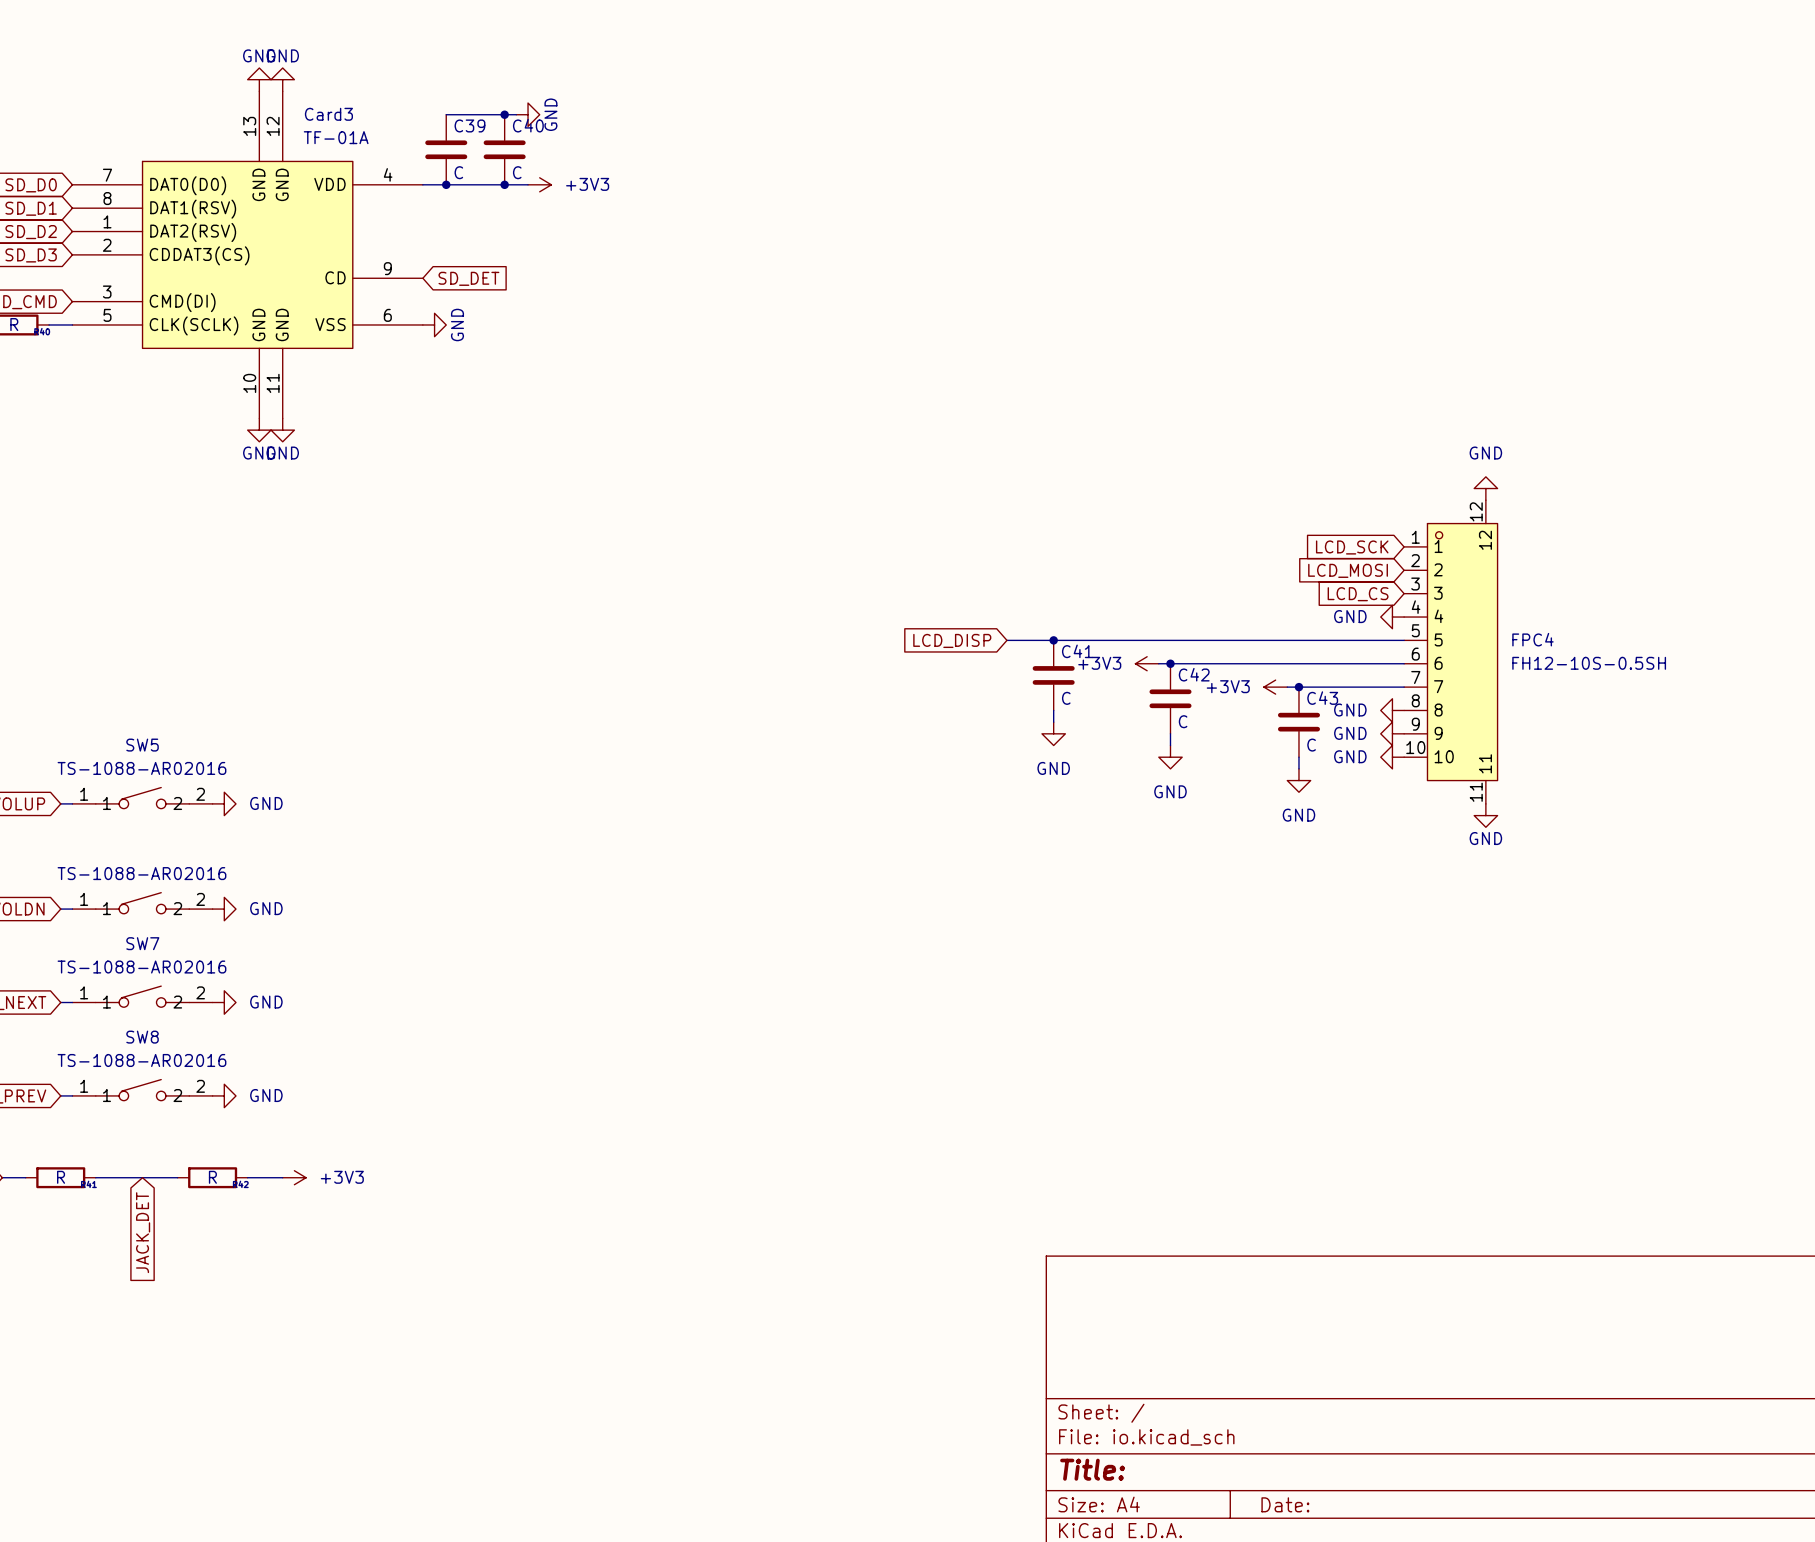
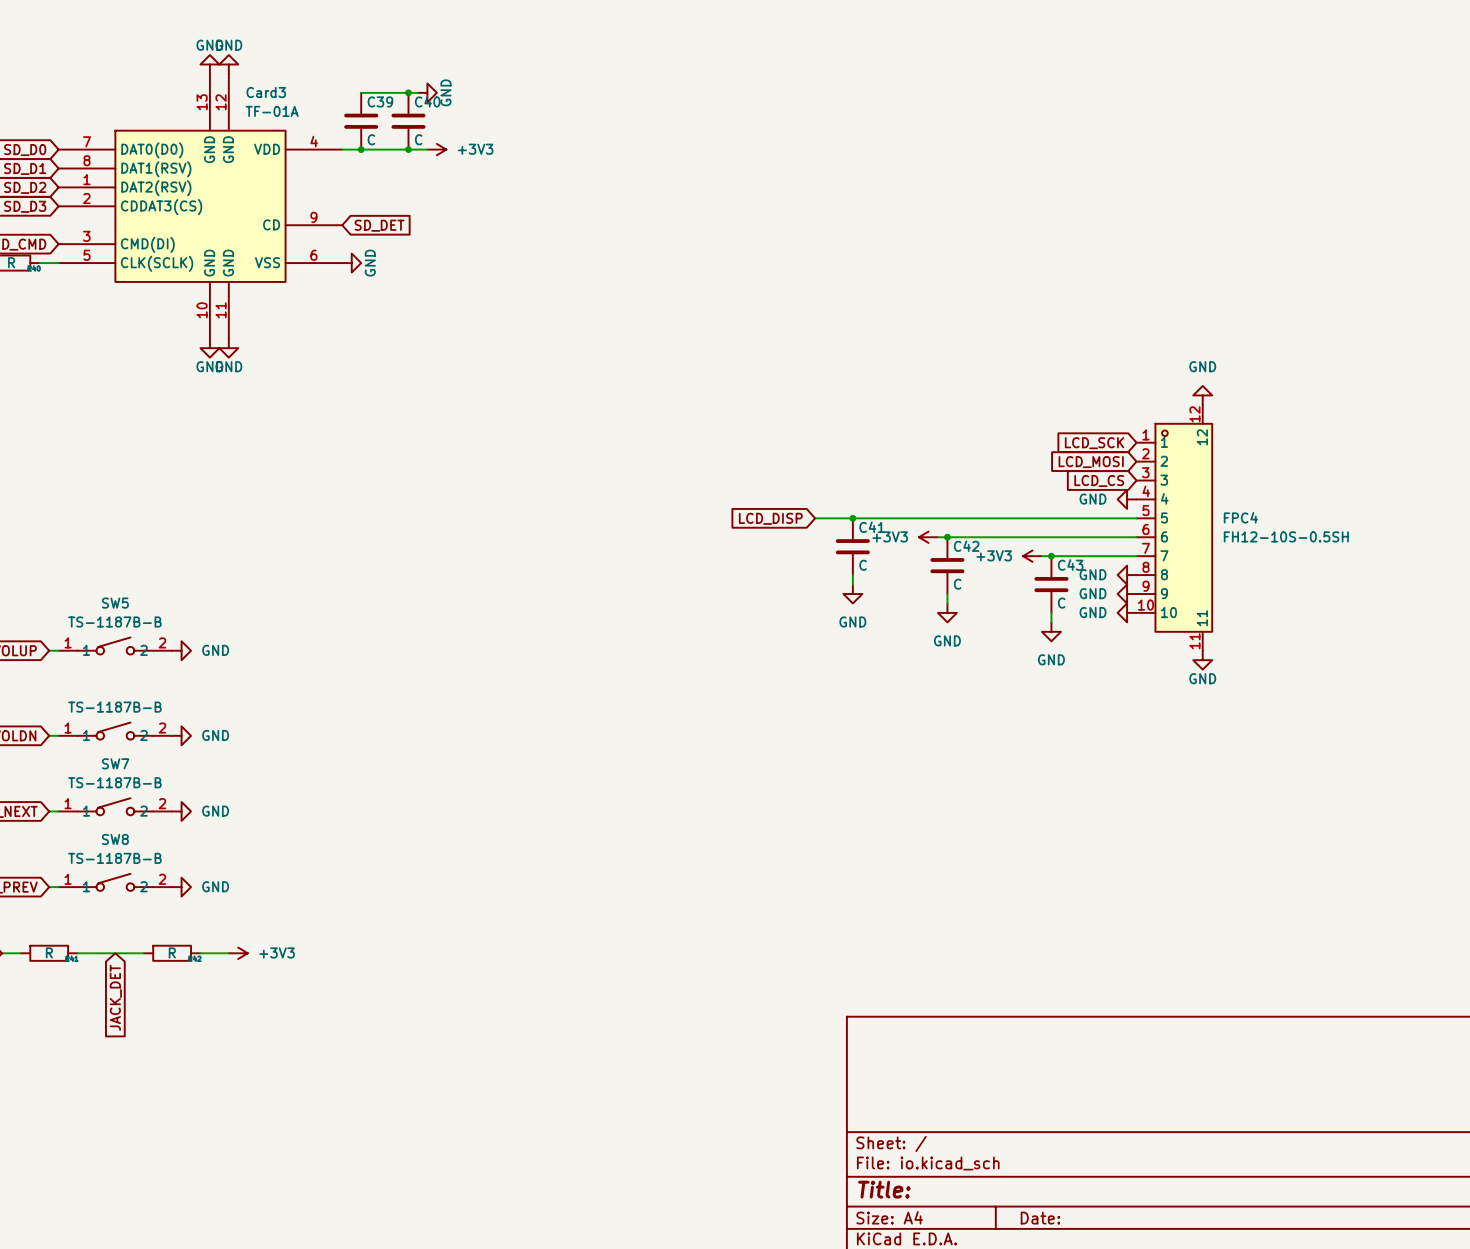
SW5 value: TS-1088-AR02016 (141, 768) -> TS-1187B-B (114, 622)
part value: TS-1088-AR02016 (141, 873) -> TS-1187B-B (114, 707)
SW7 value: TS-1088-AR02016 (141, 967) -> TS-1187B-B (114, 782)
SW8 value: TS-1088-AR02016 (141, 1060) -> TS-1187B-B (114, 858)

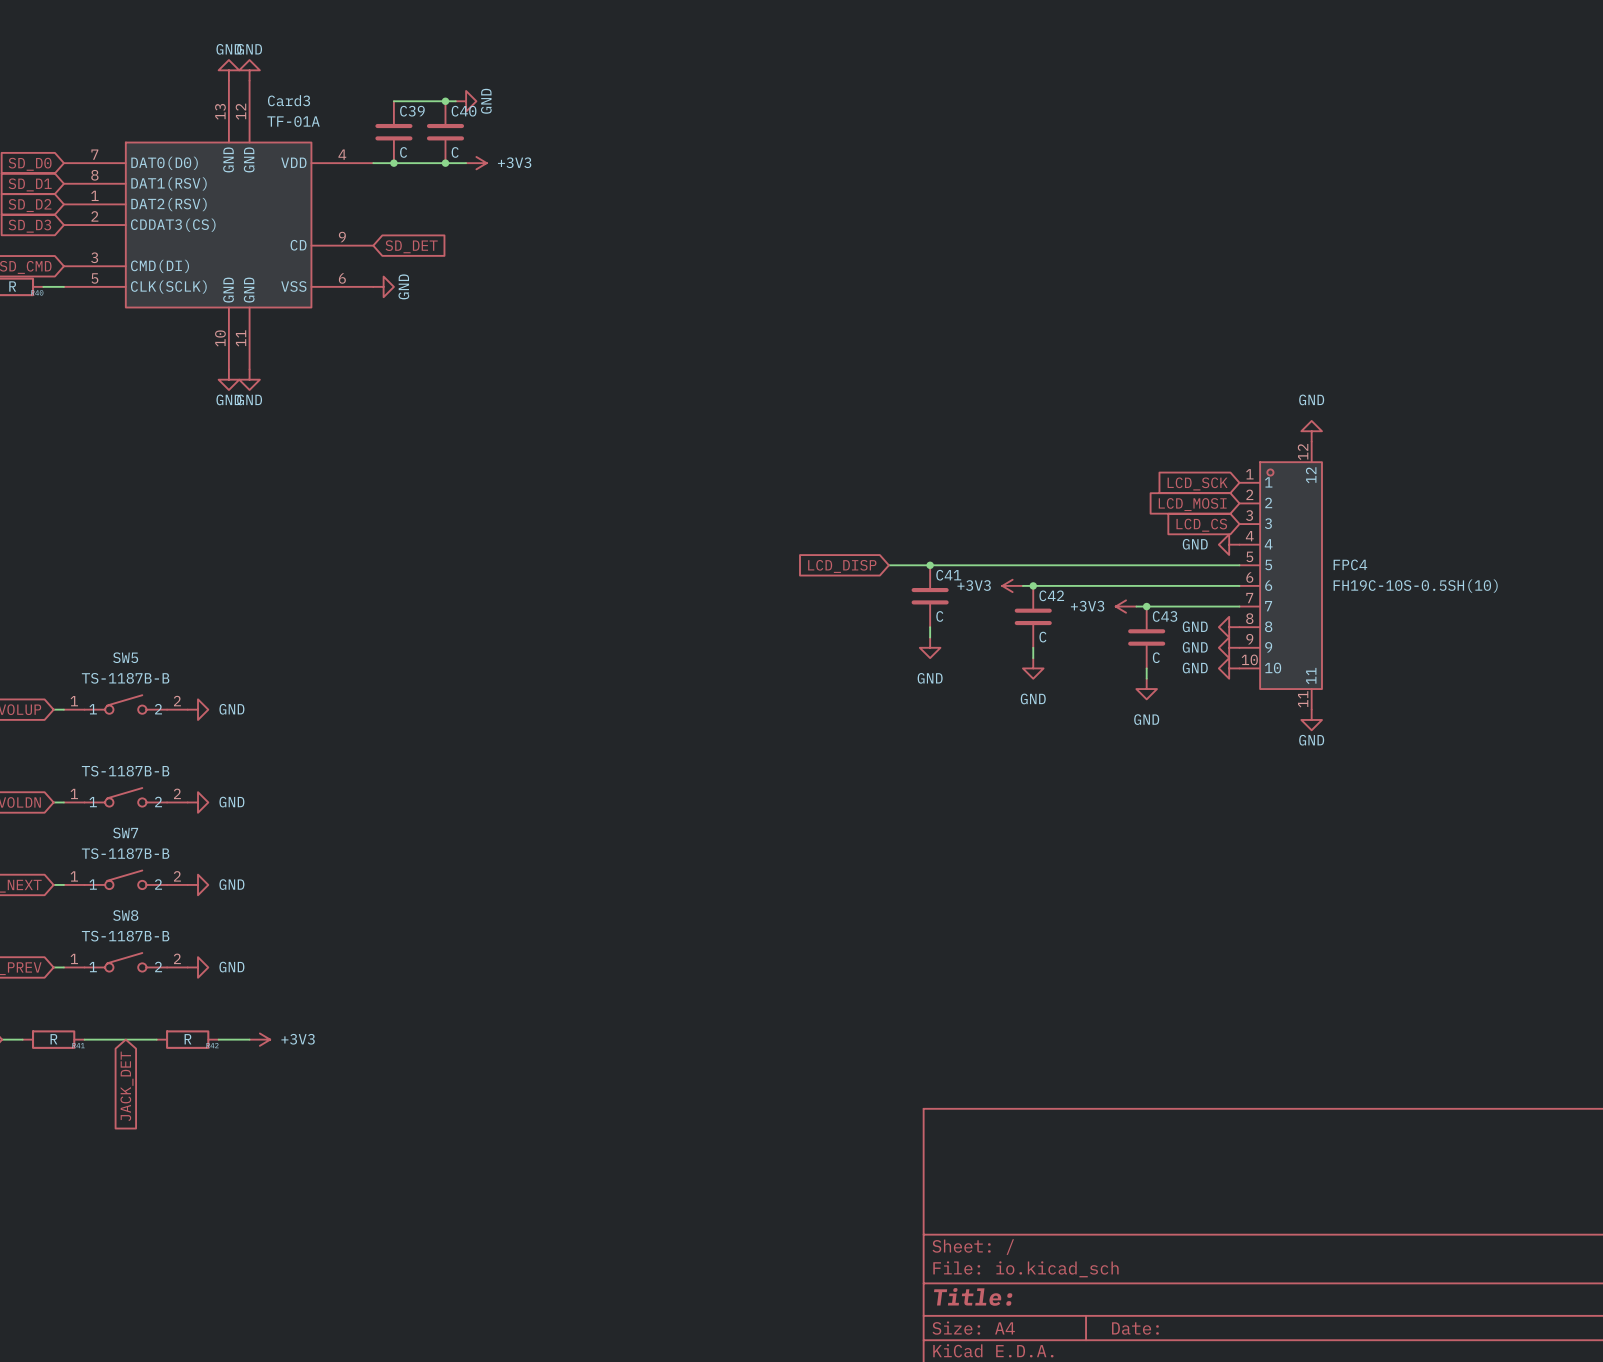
FPC4 value: FH12-10S-0.5SH (1286, 536) -> FH19C-10S-0.5SH(10) (1415, 586)

